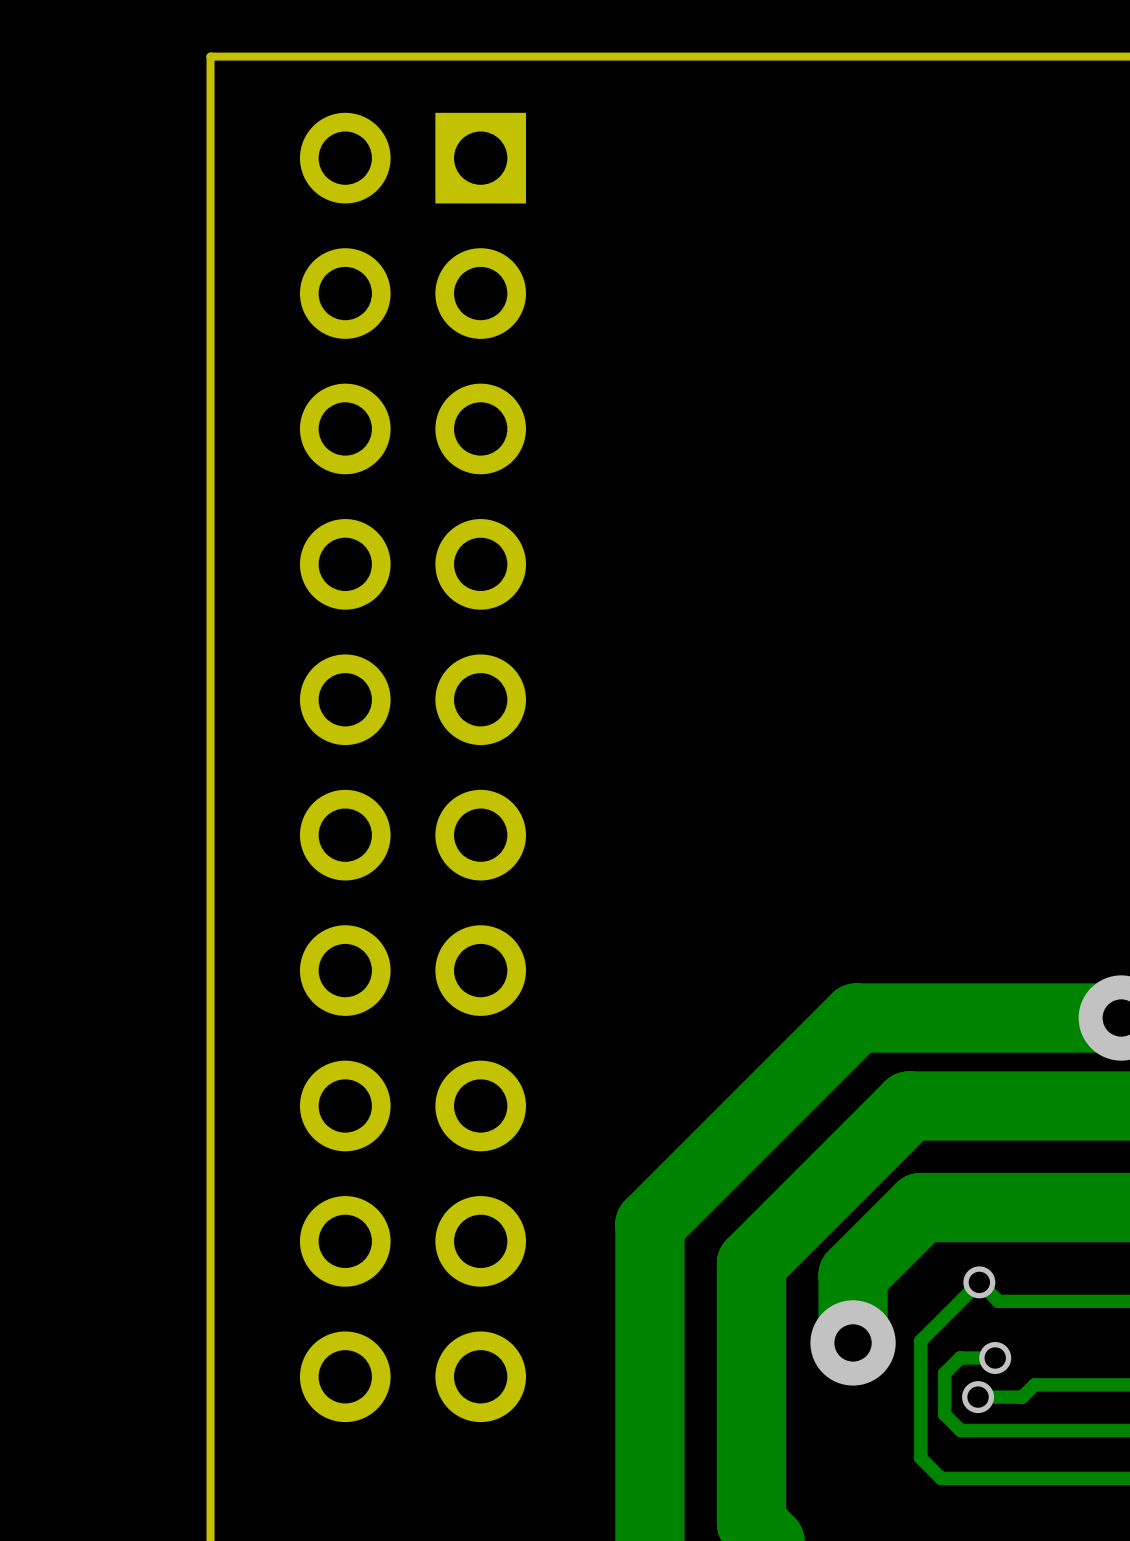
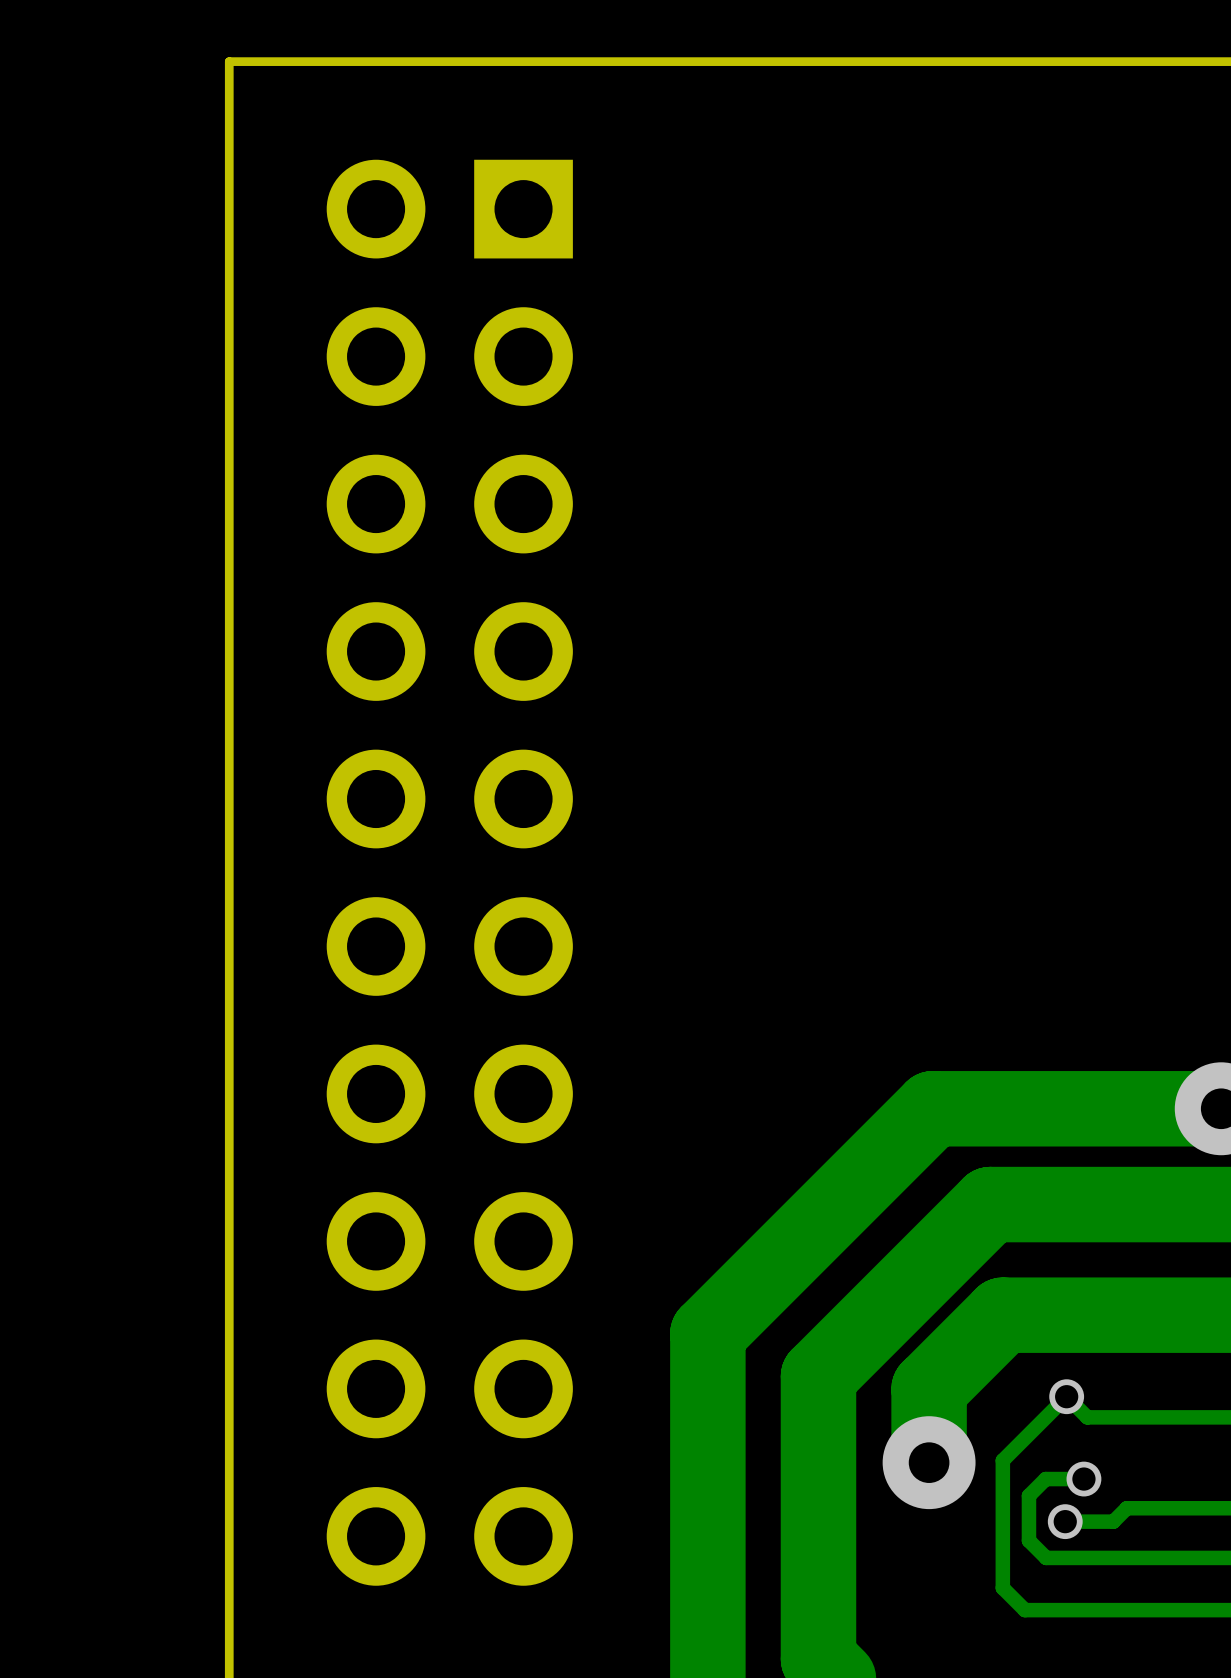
part position: (412, 767) -> (449, 872)

